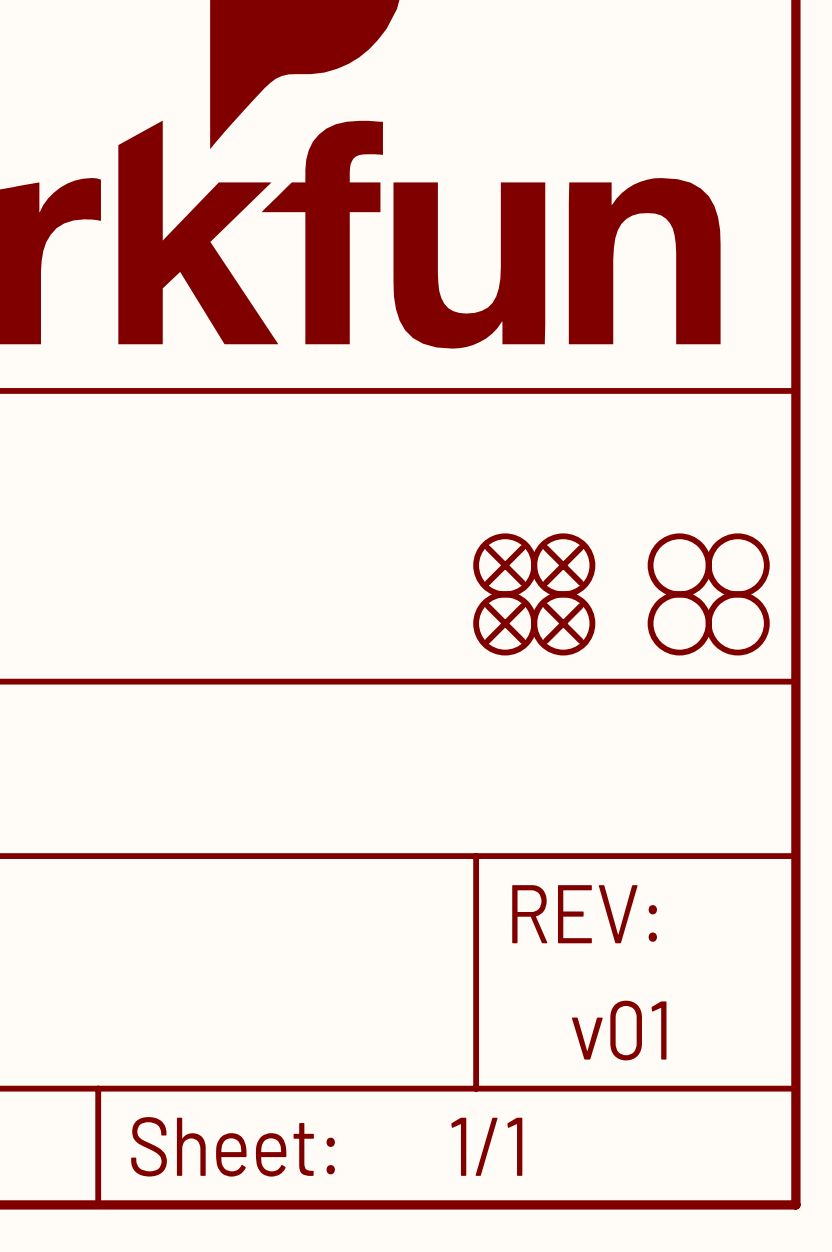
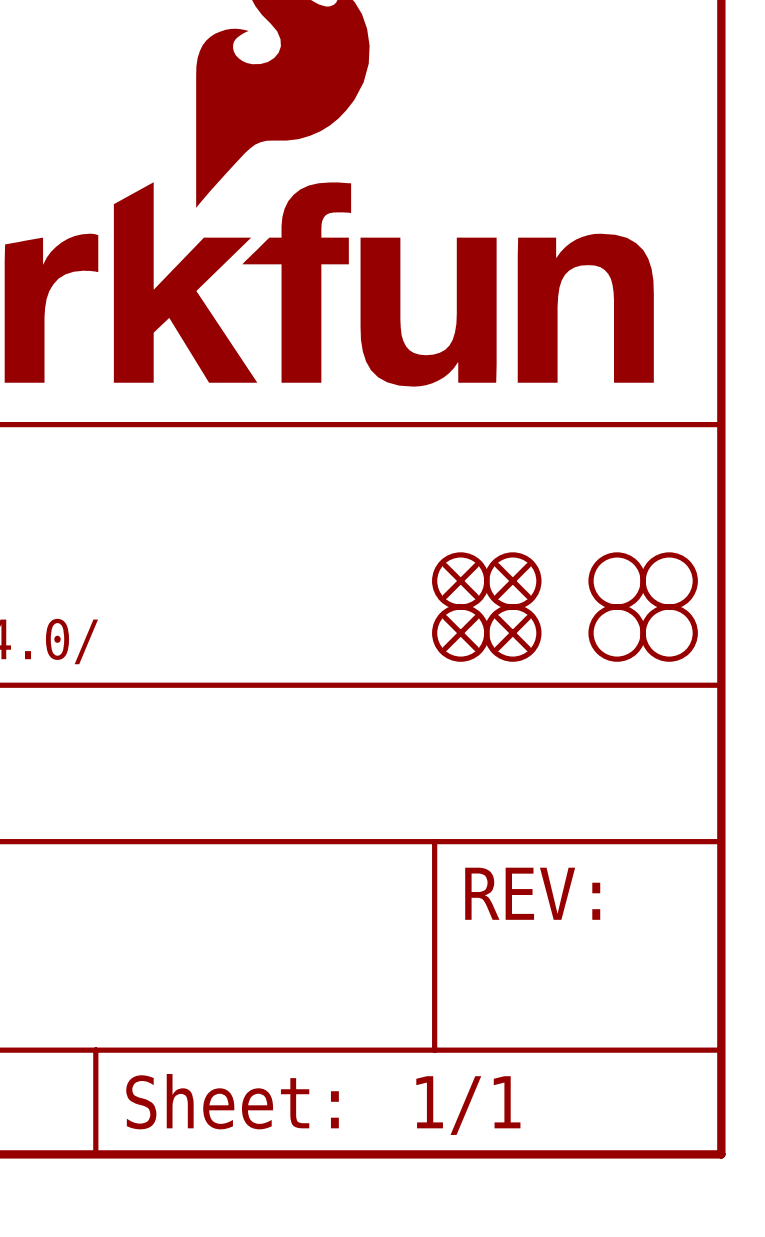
text: v01 (619, 1030) -> none

